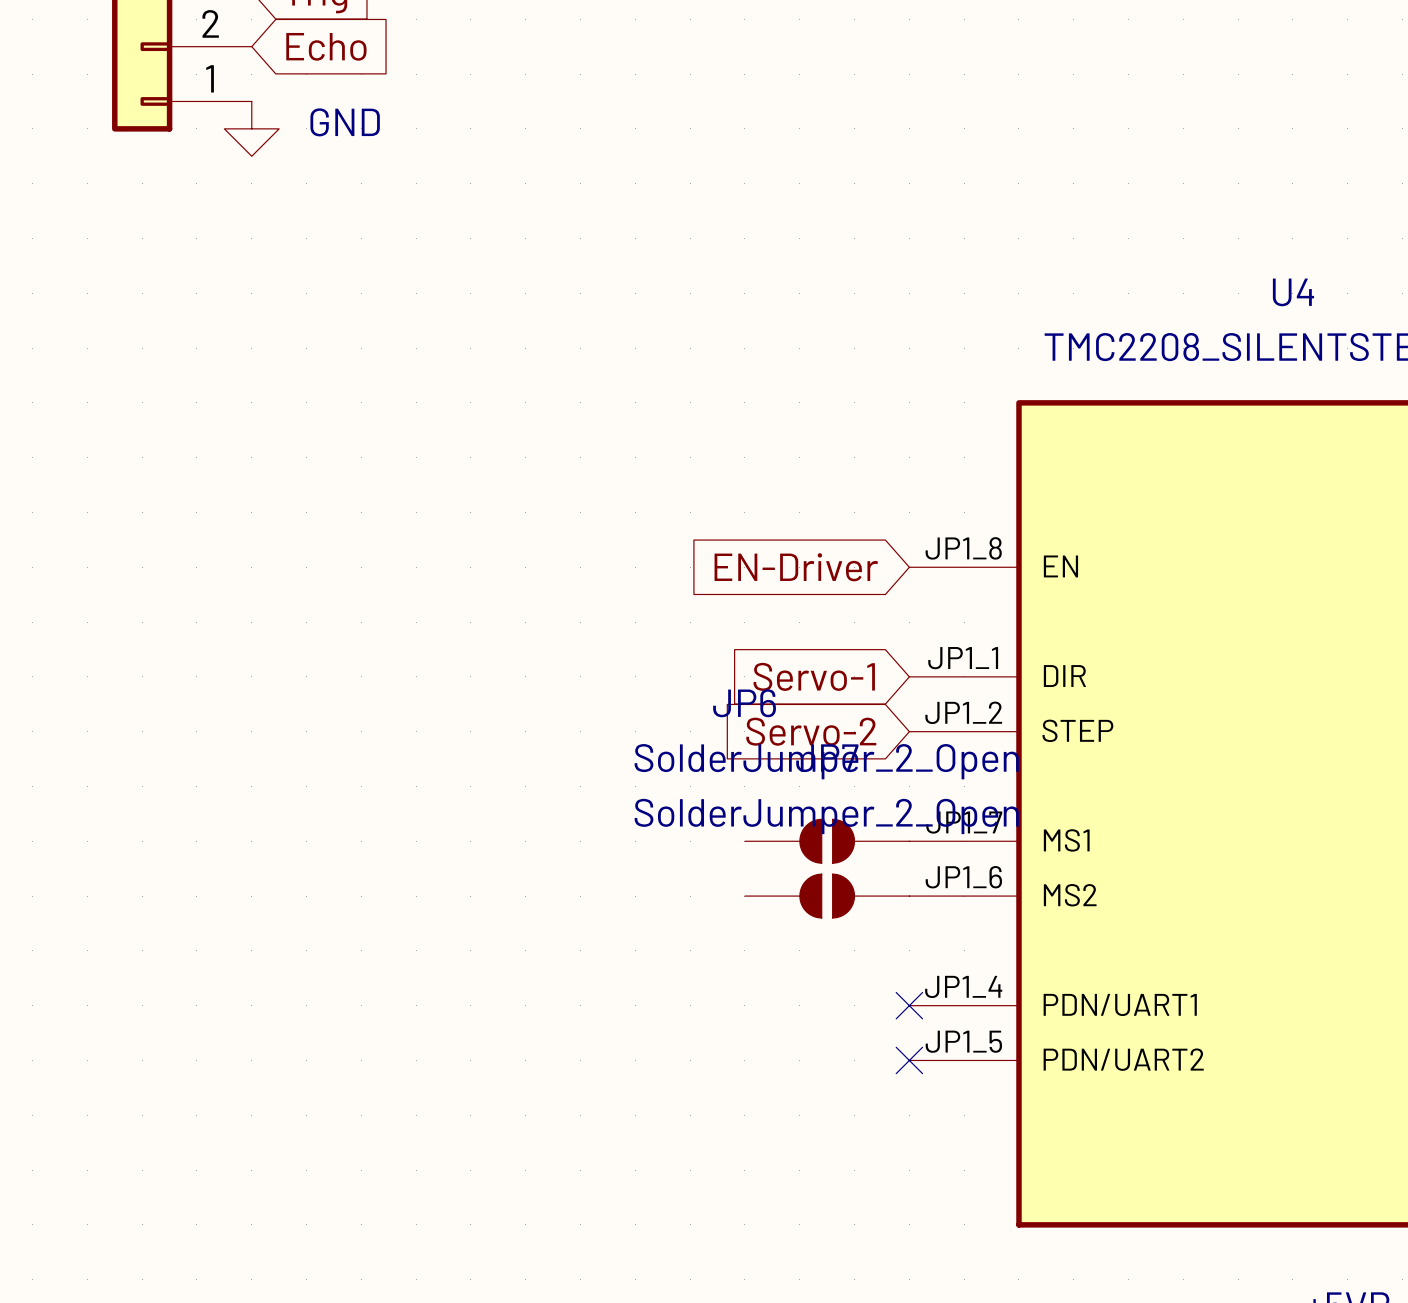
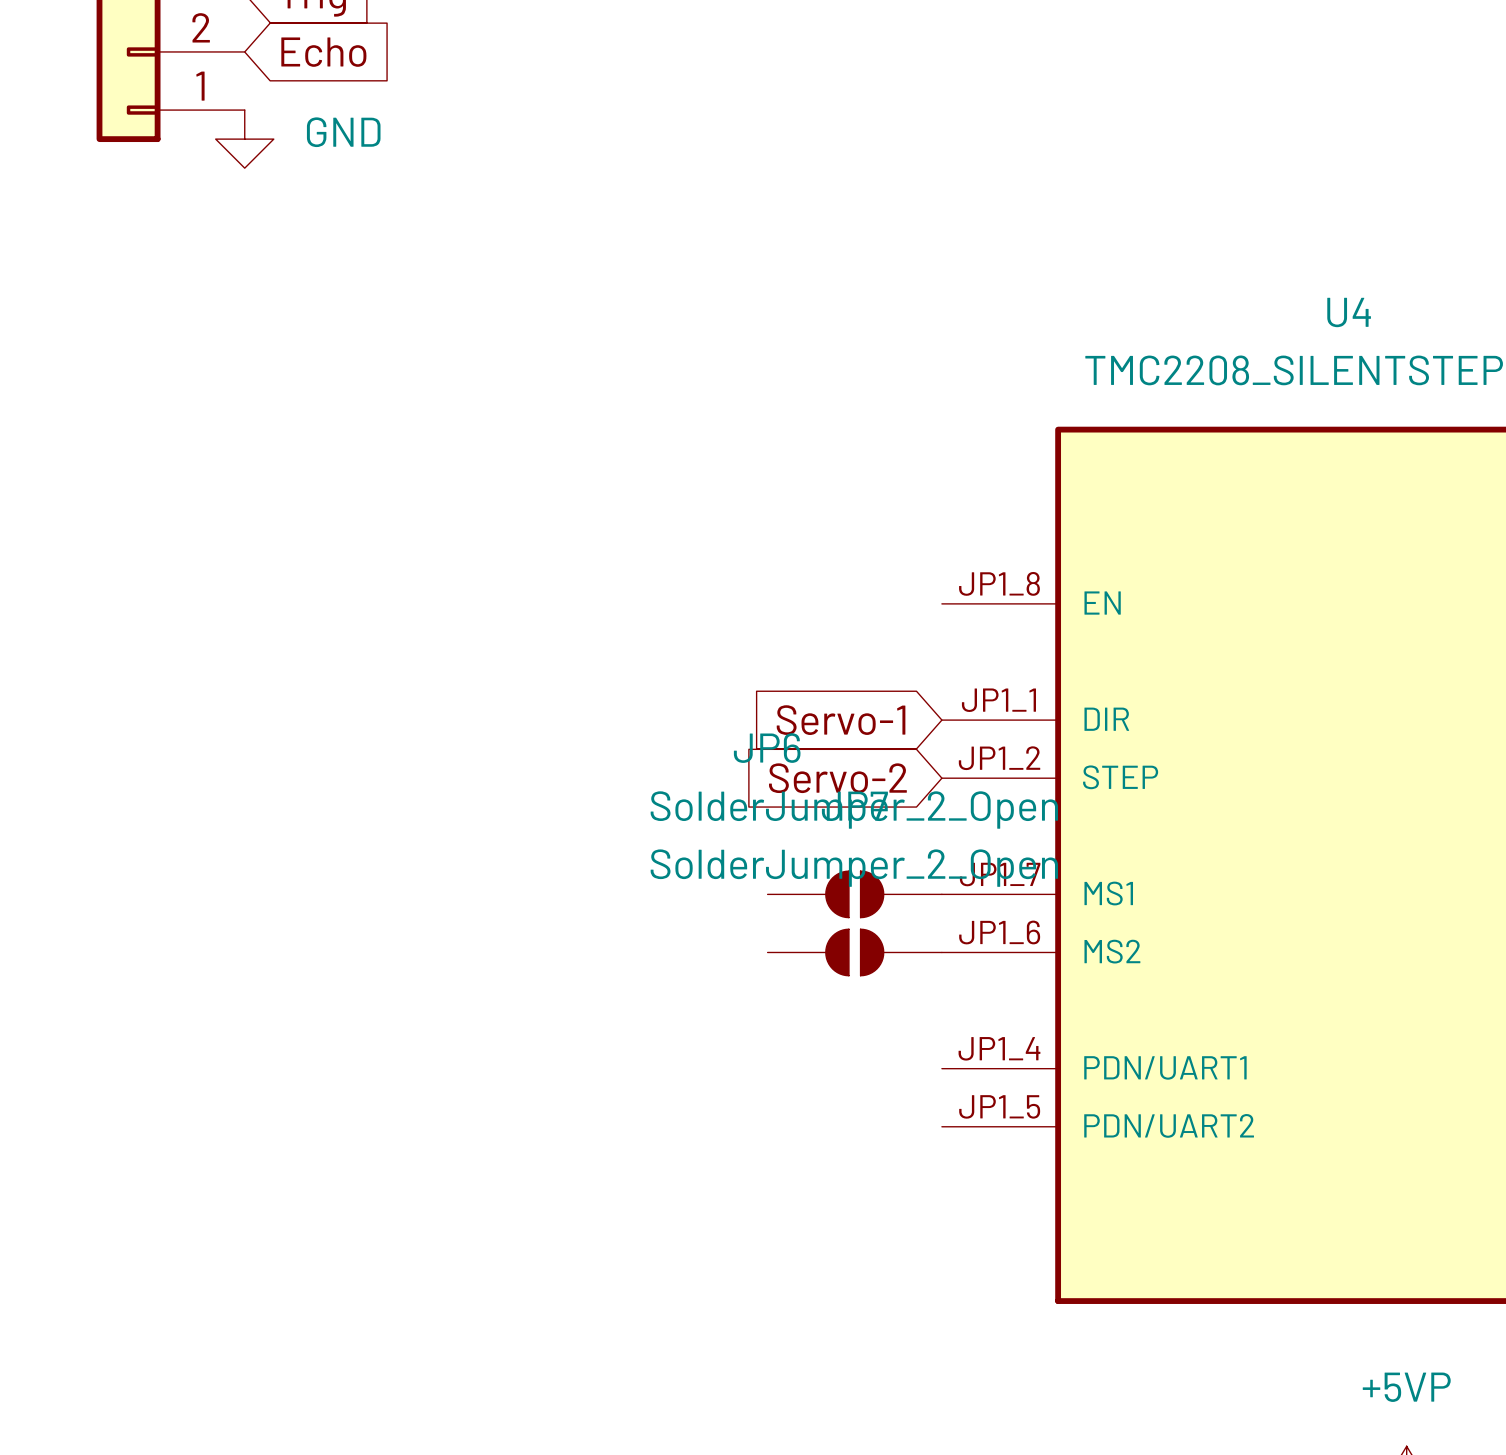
global label: EN-Driver (796, 567) -> none
no-connect mark: (909, 1005) -> none
no-connect mark: (909, 1060) -> none

